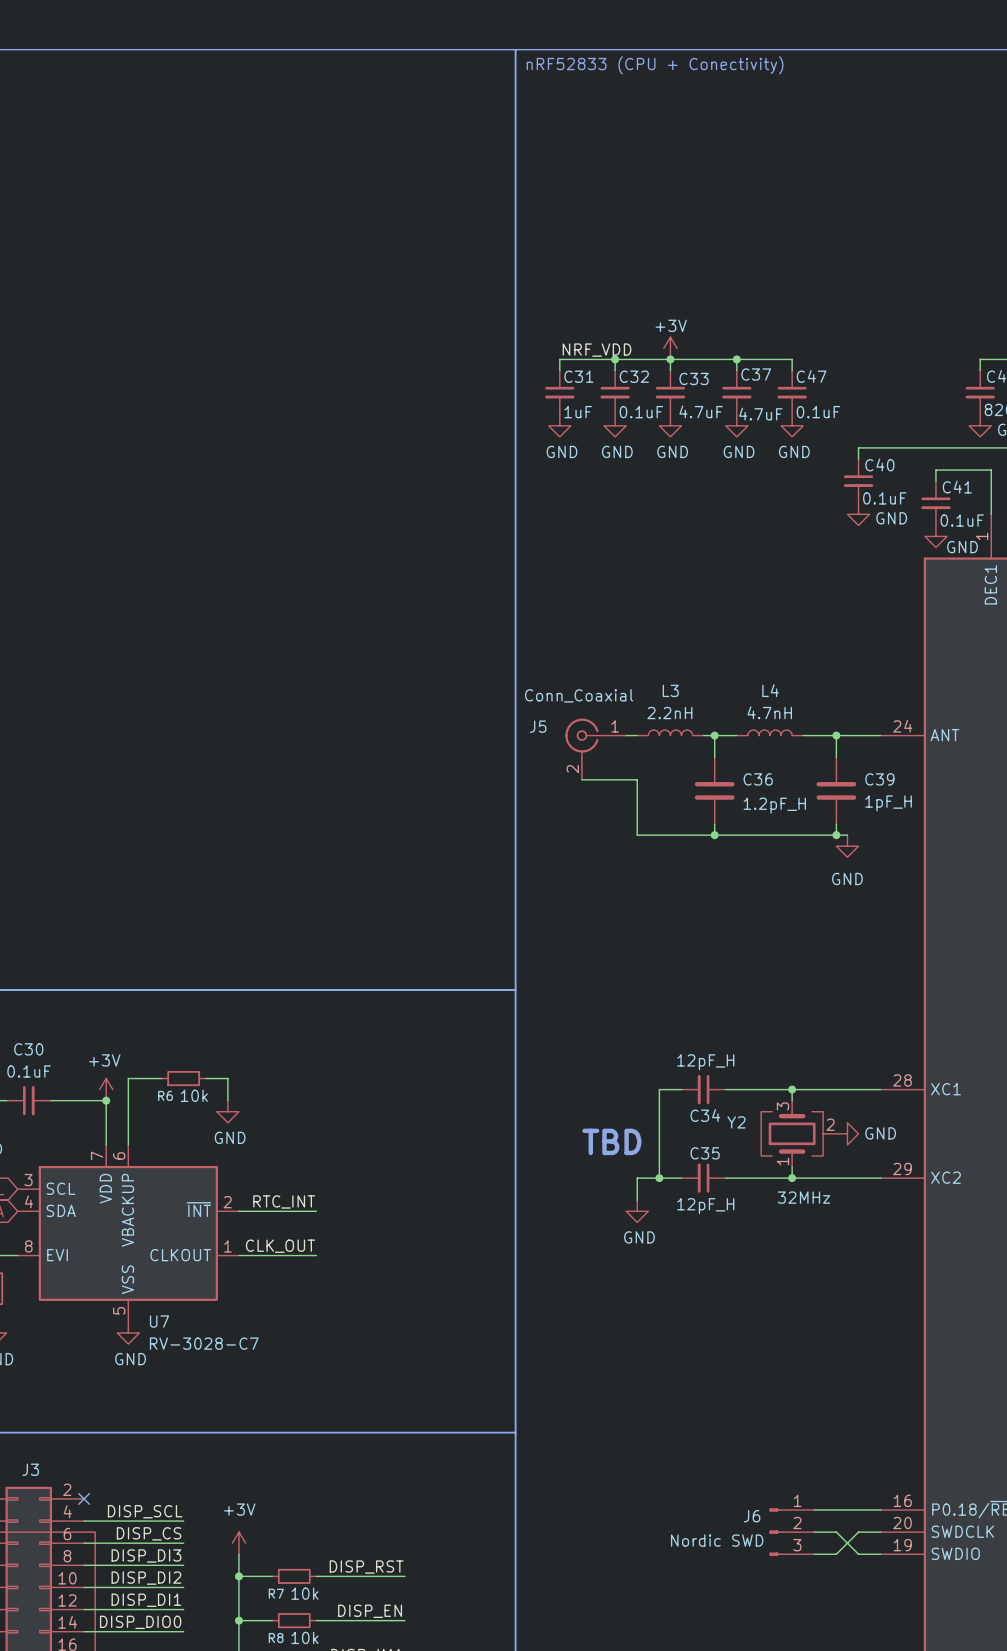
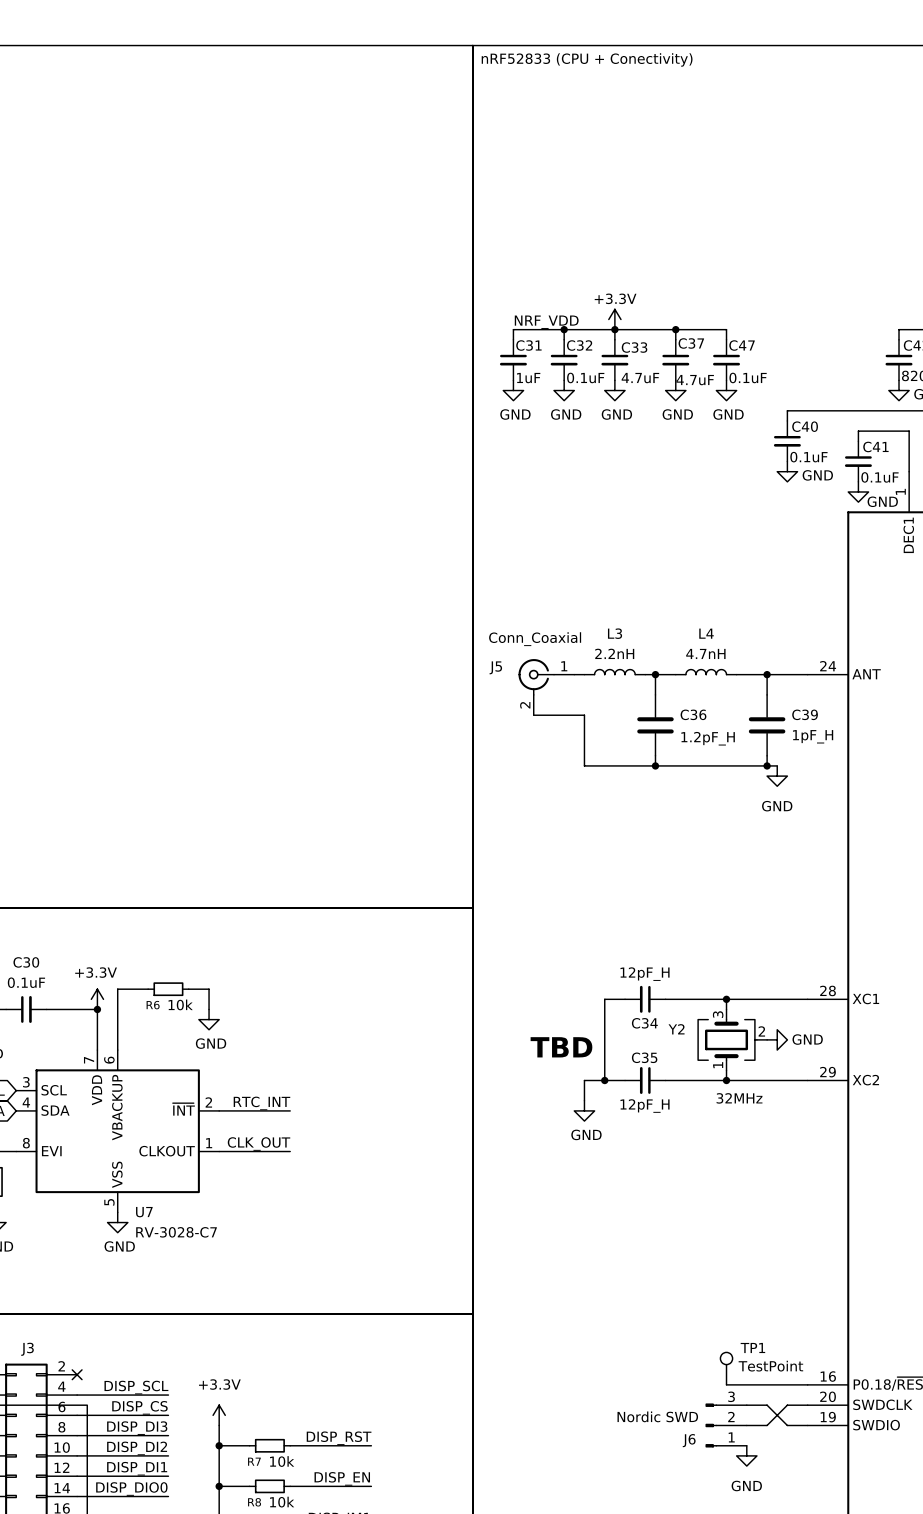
power symbol: +3V (670, 348) -> +3.3V (614, 319)
power symbol: +3V (106, 1089) -> +3.3V (97, 999)
TP1: none -> TestPoint (726, 1368)
J6 flip: as is (775, 1532) -> up-down (711, 1425)
power symbol: +3V (238, 1543) -> +3.3V (219, 1415)
power symbol: none -> GND (746, 1455)

